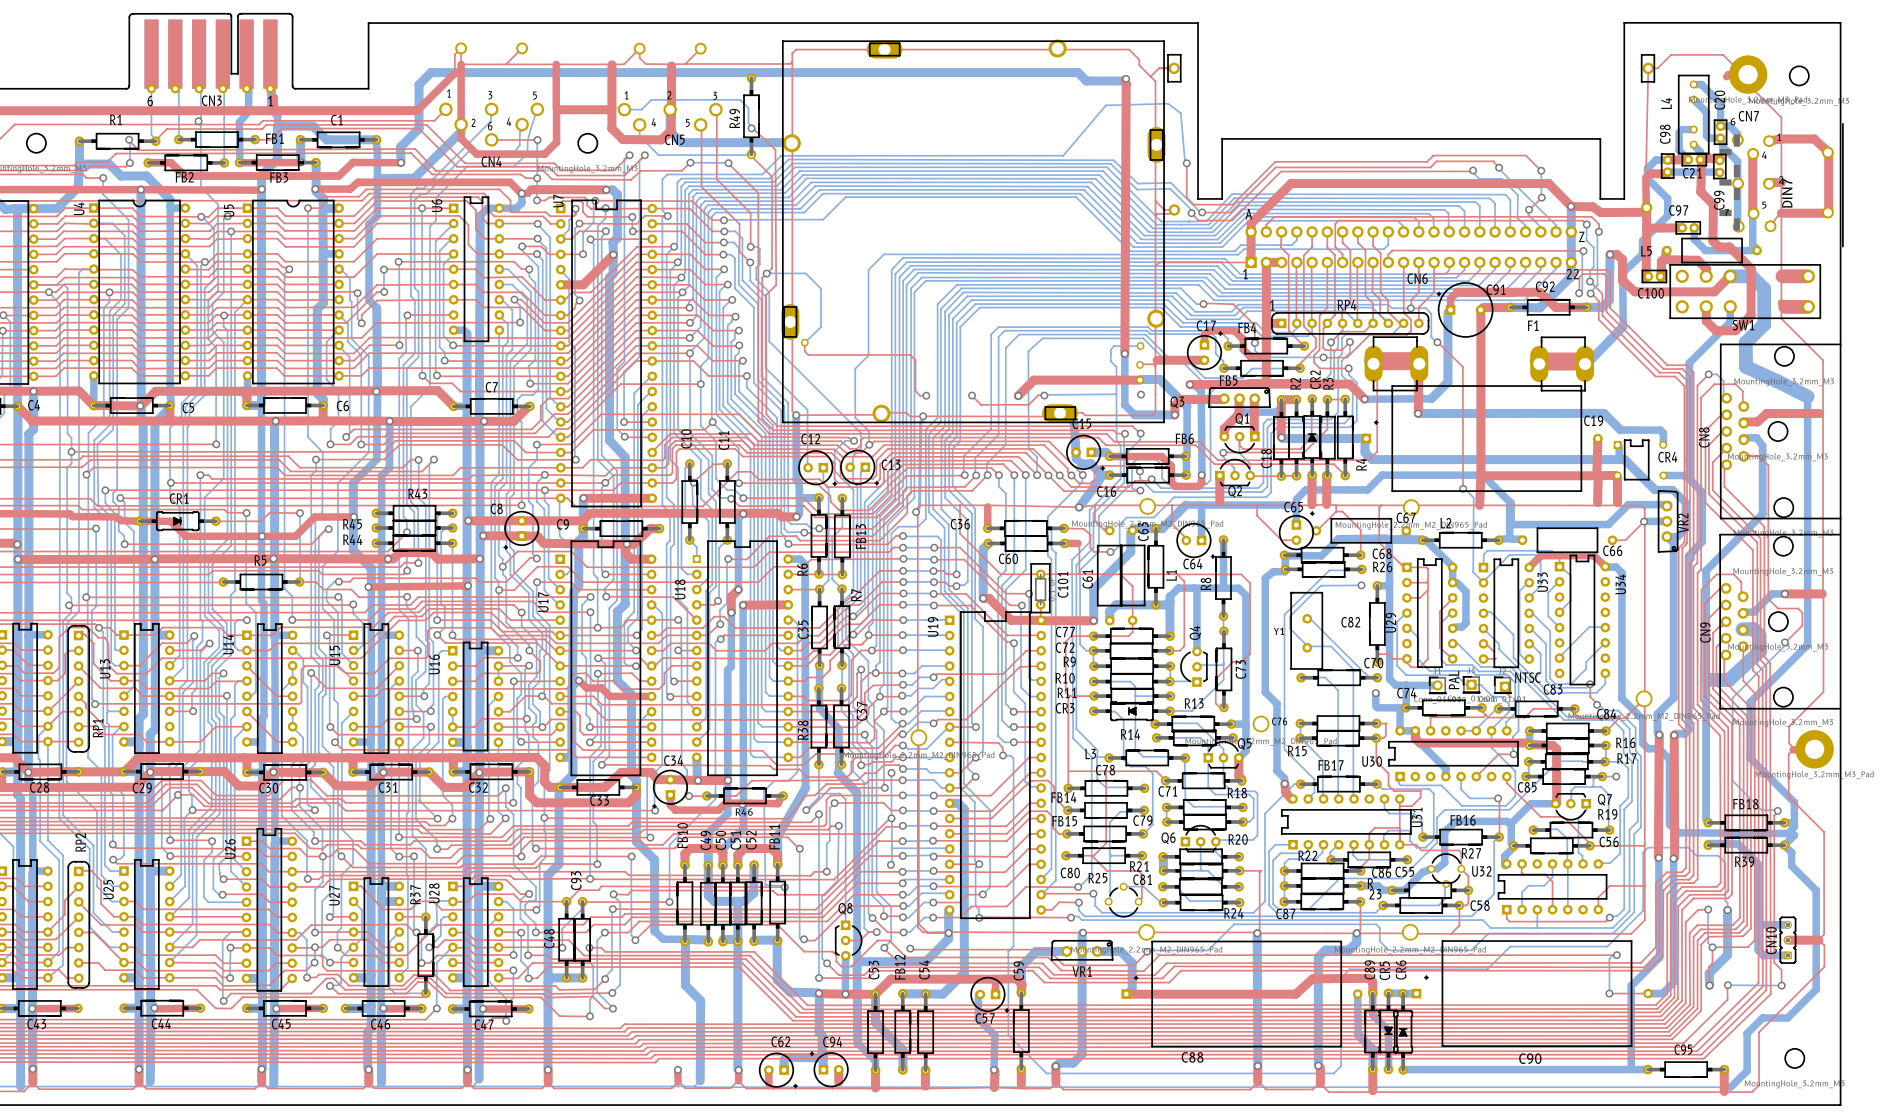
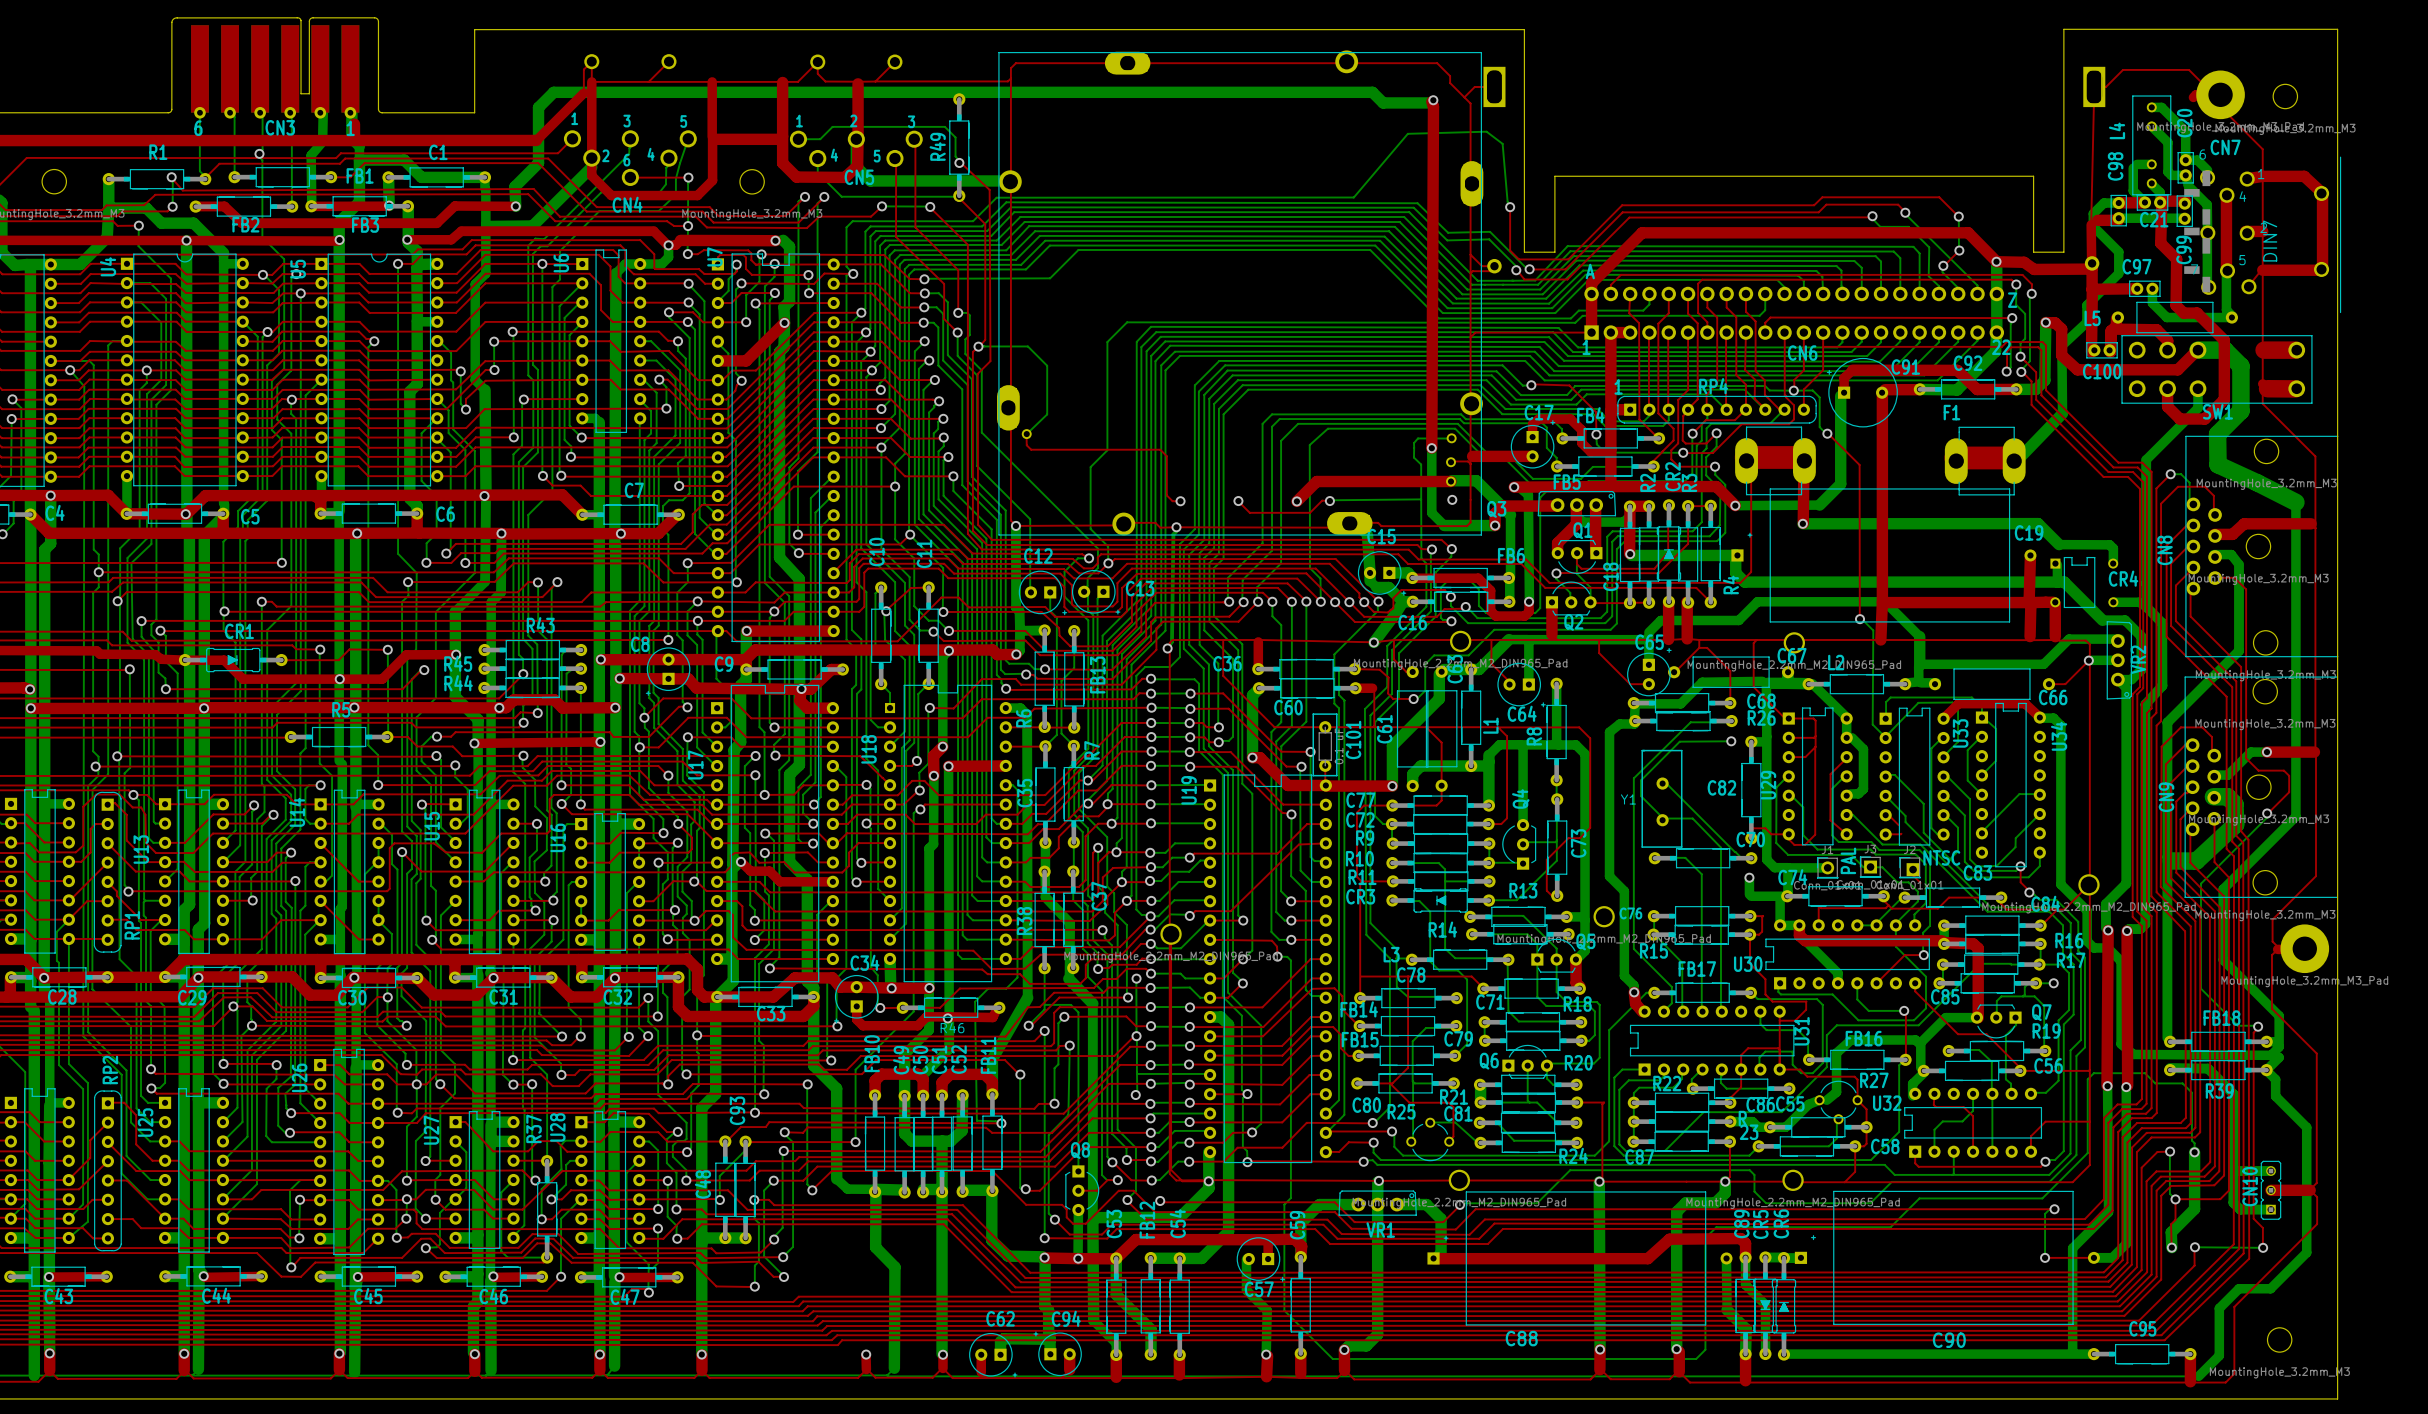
CN6 footprint: [1168, 62, 1655, 269] -> [1483, 66, 2106, 340]

